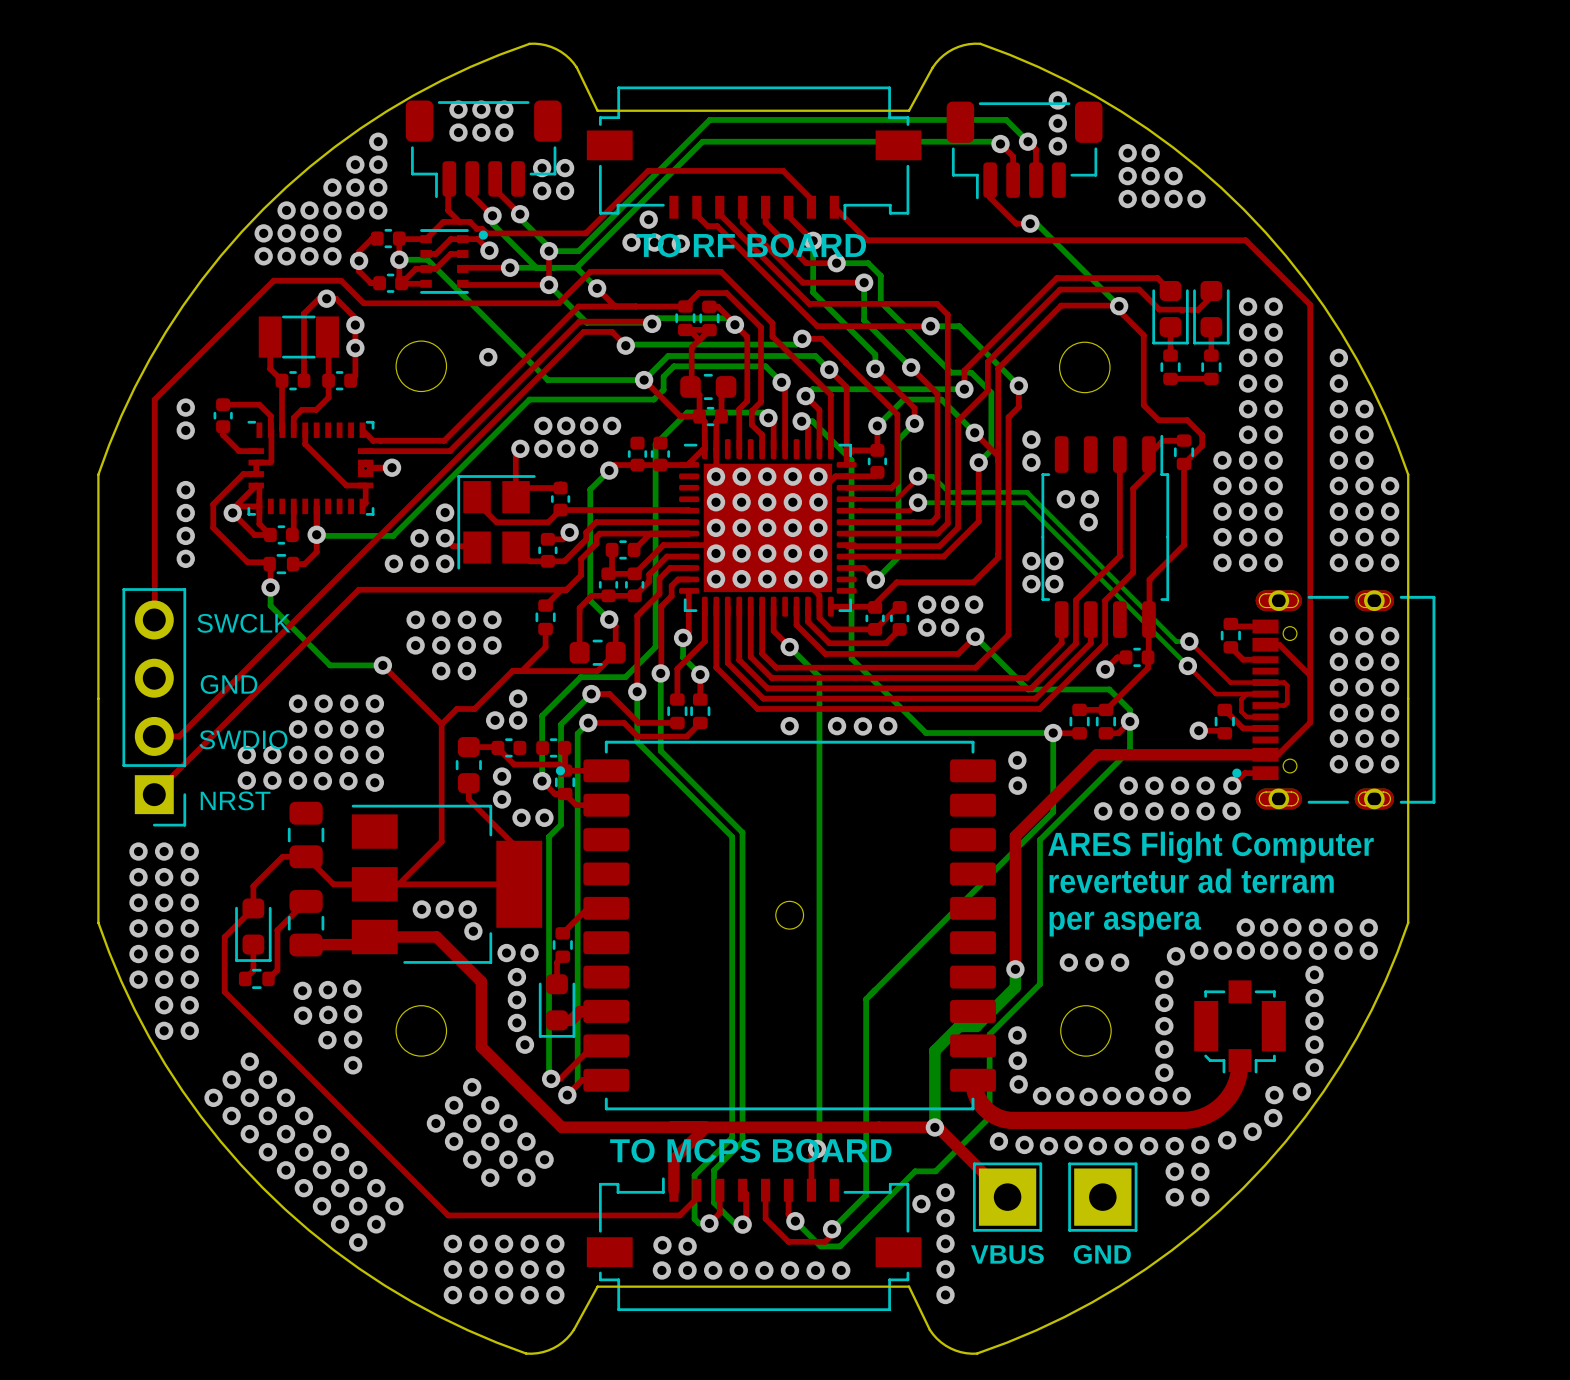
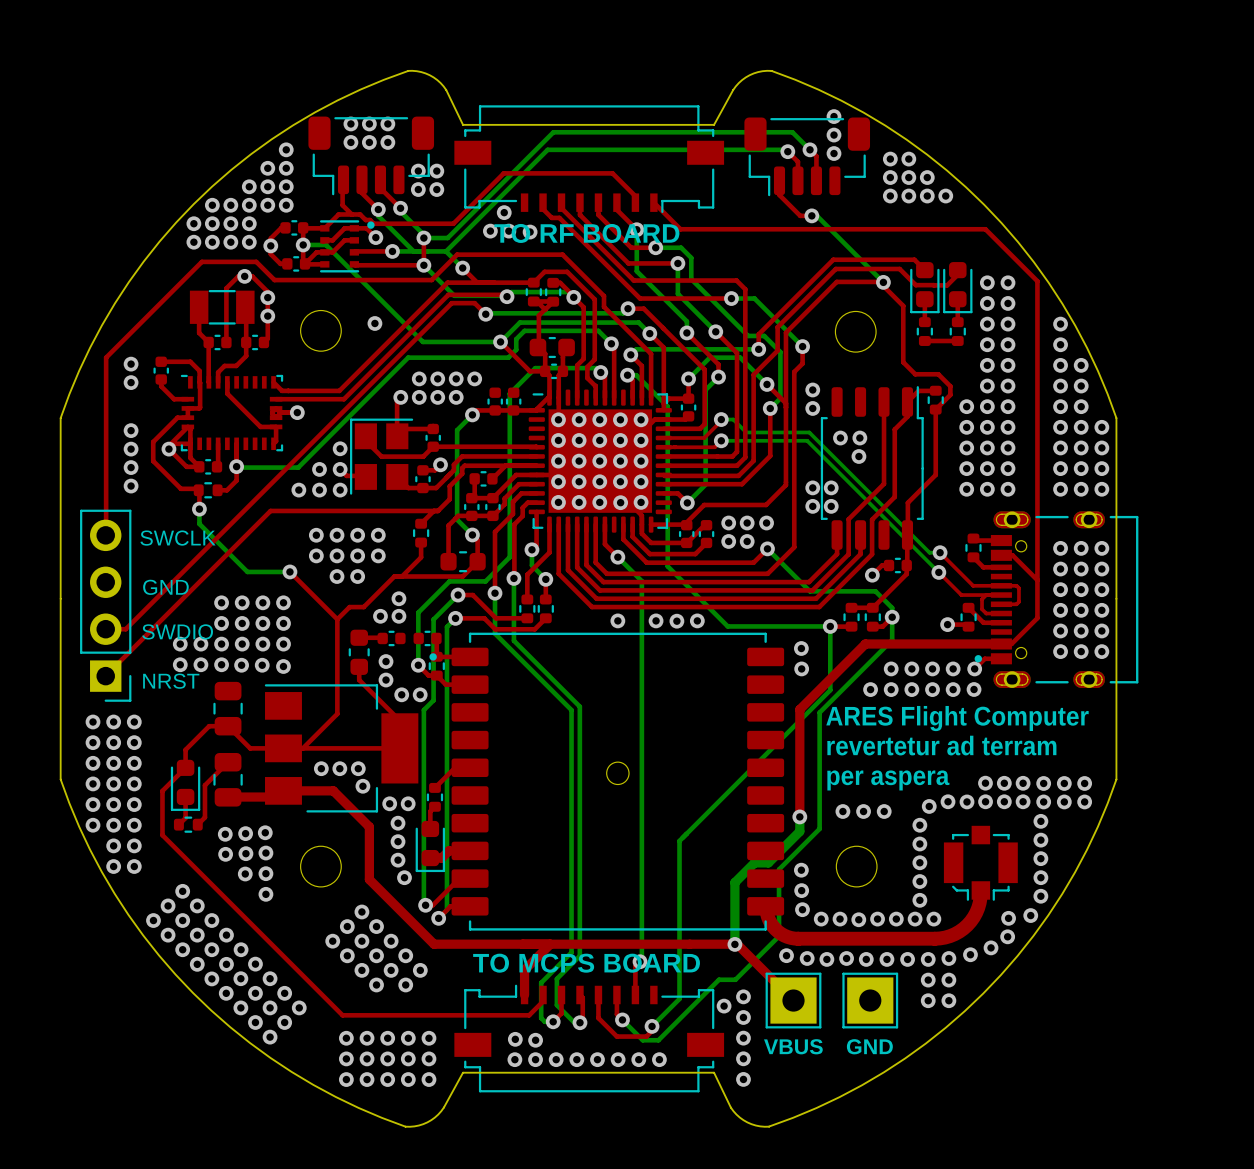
top track: (497, 747) (514, 764) (558, 764) (565, 770) -> none

